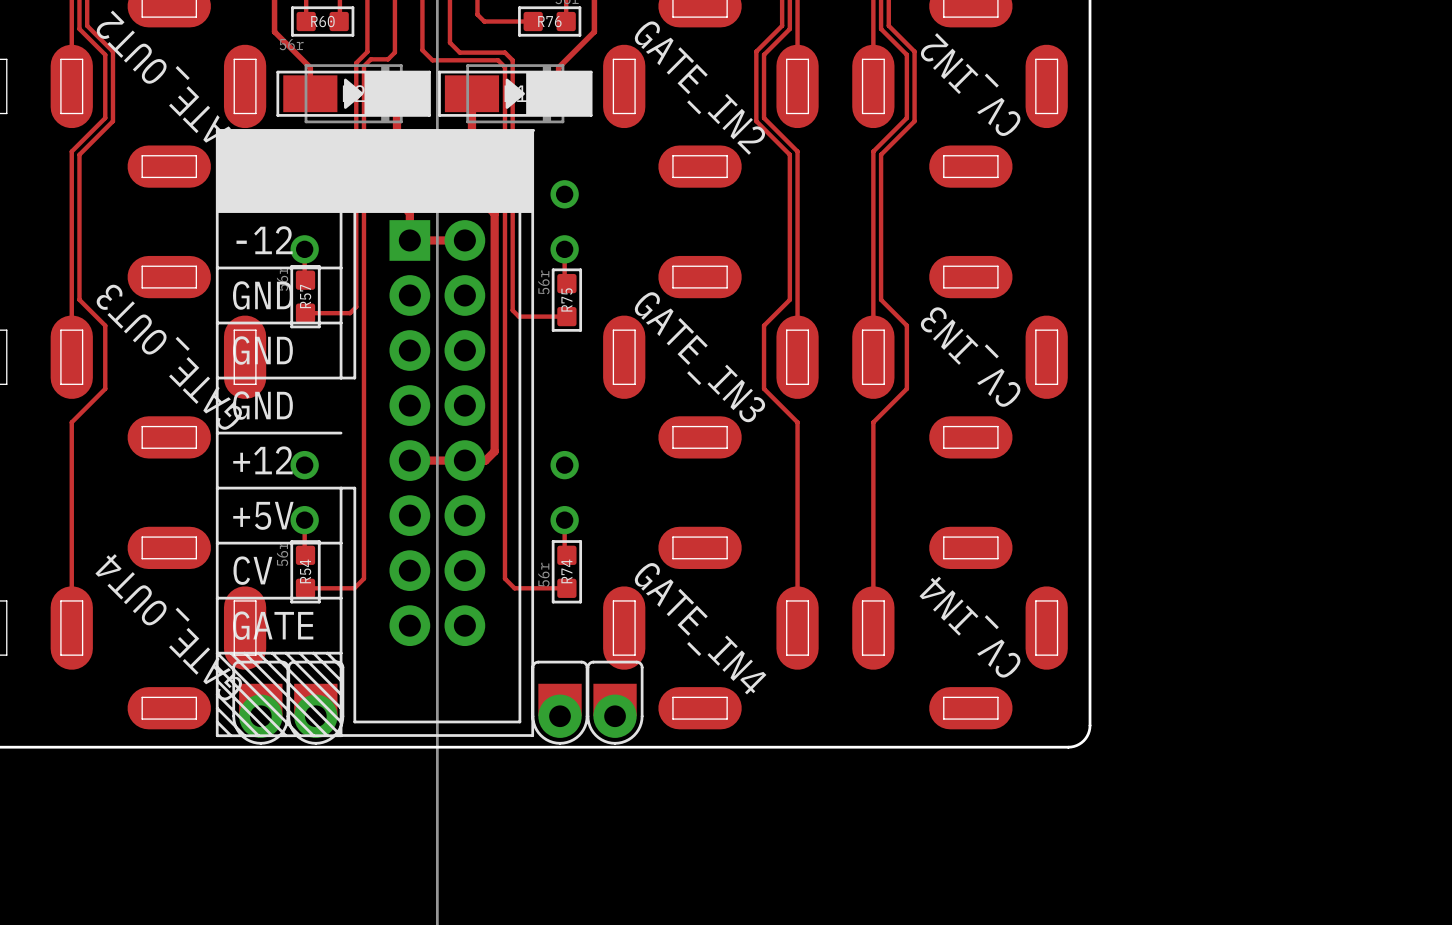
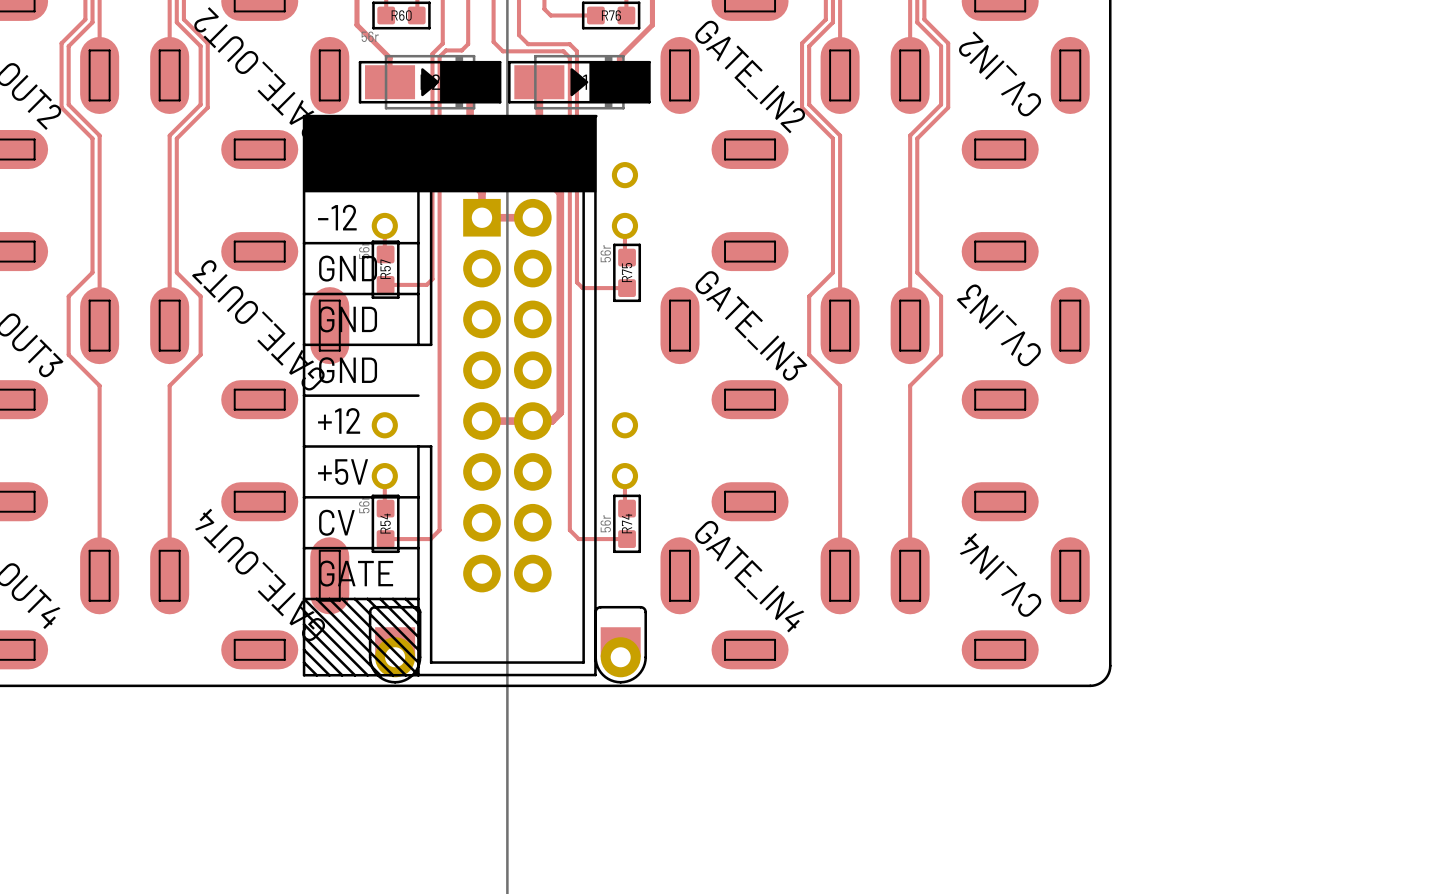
part: (260, 702) -> none
part: (615, 702) -> none

